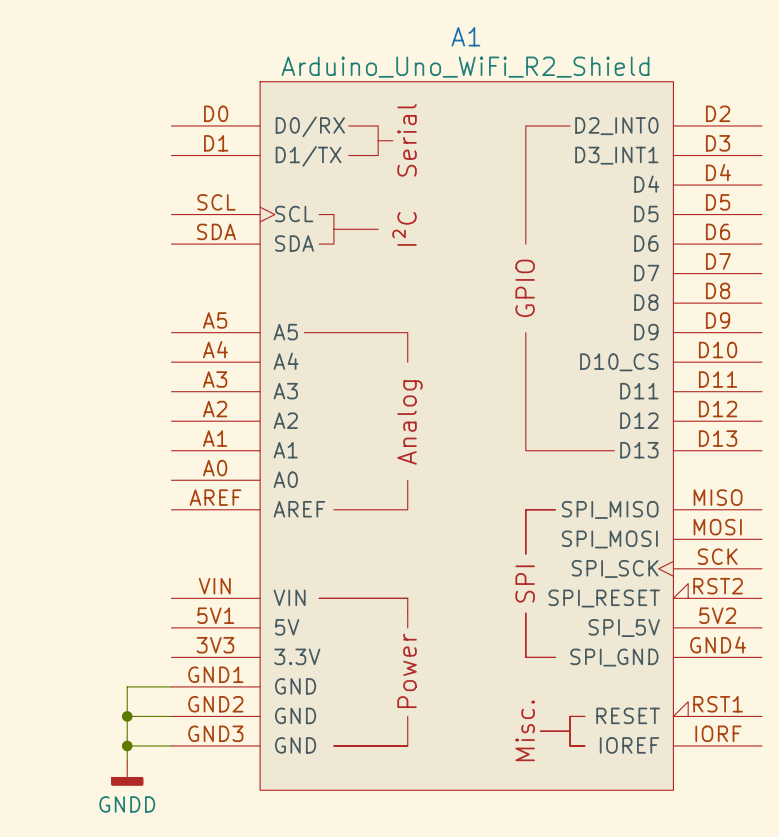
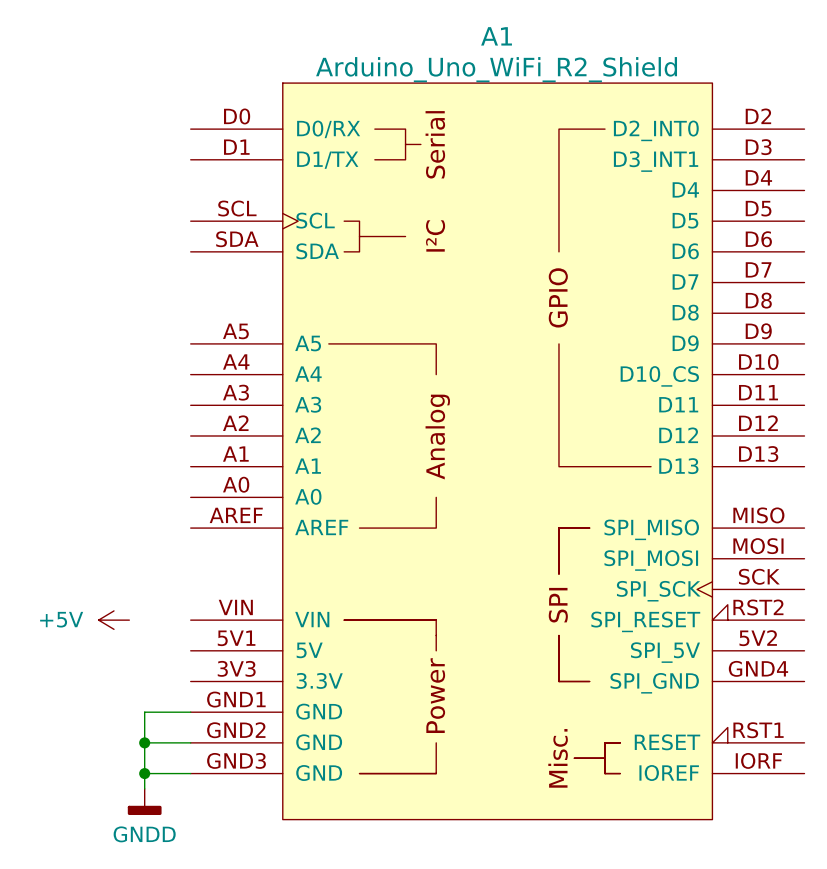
power symbol: none -> +5V (113, 620)

